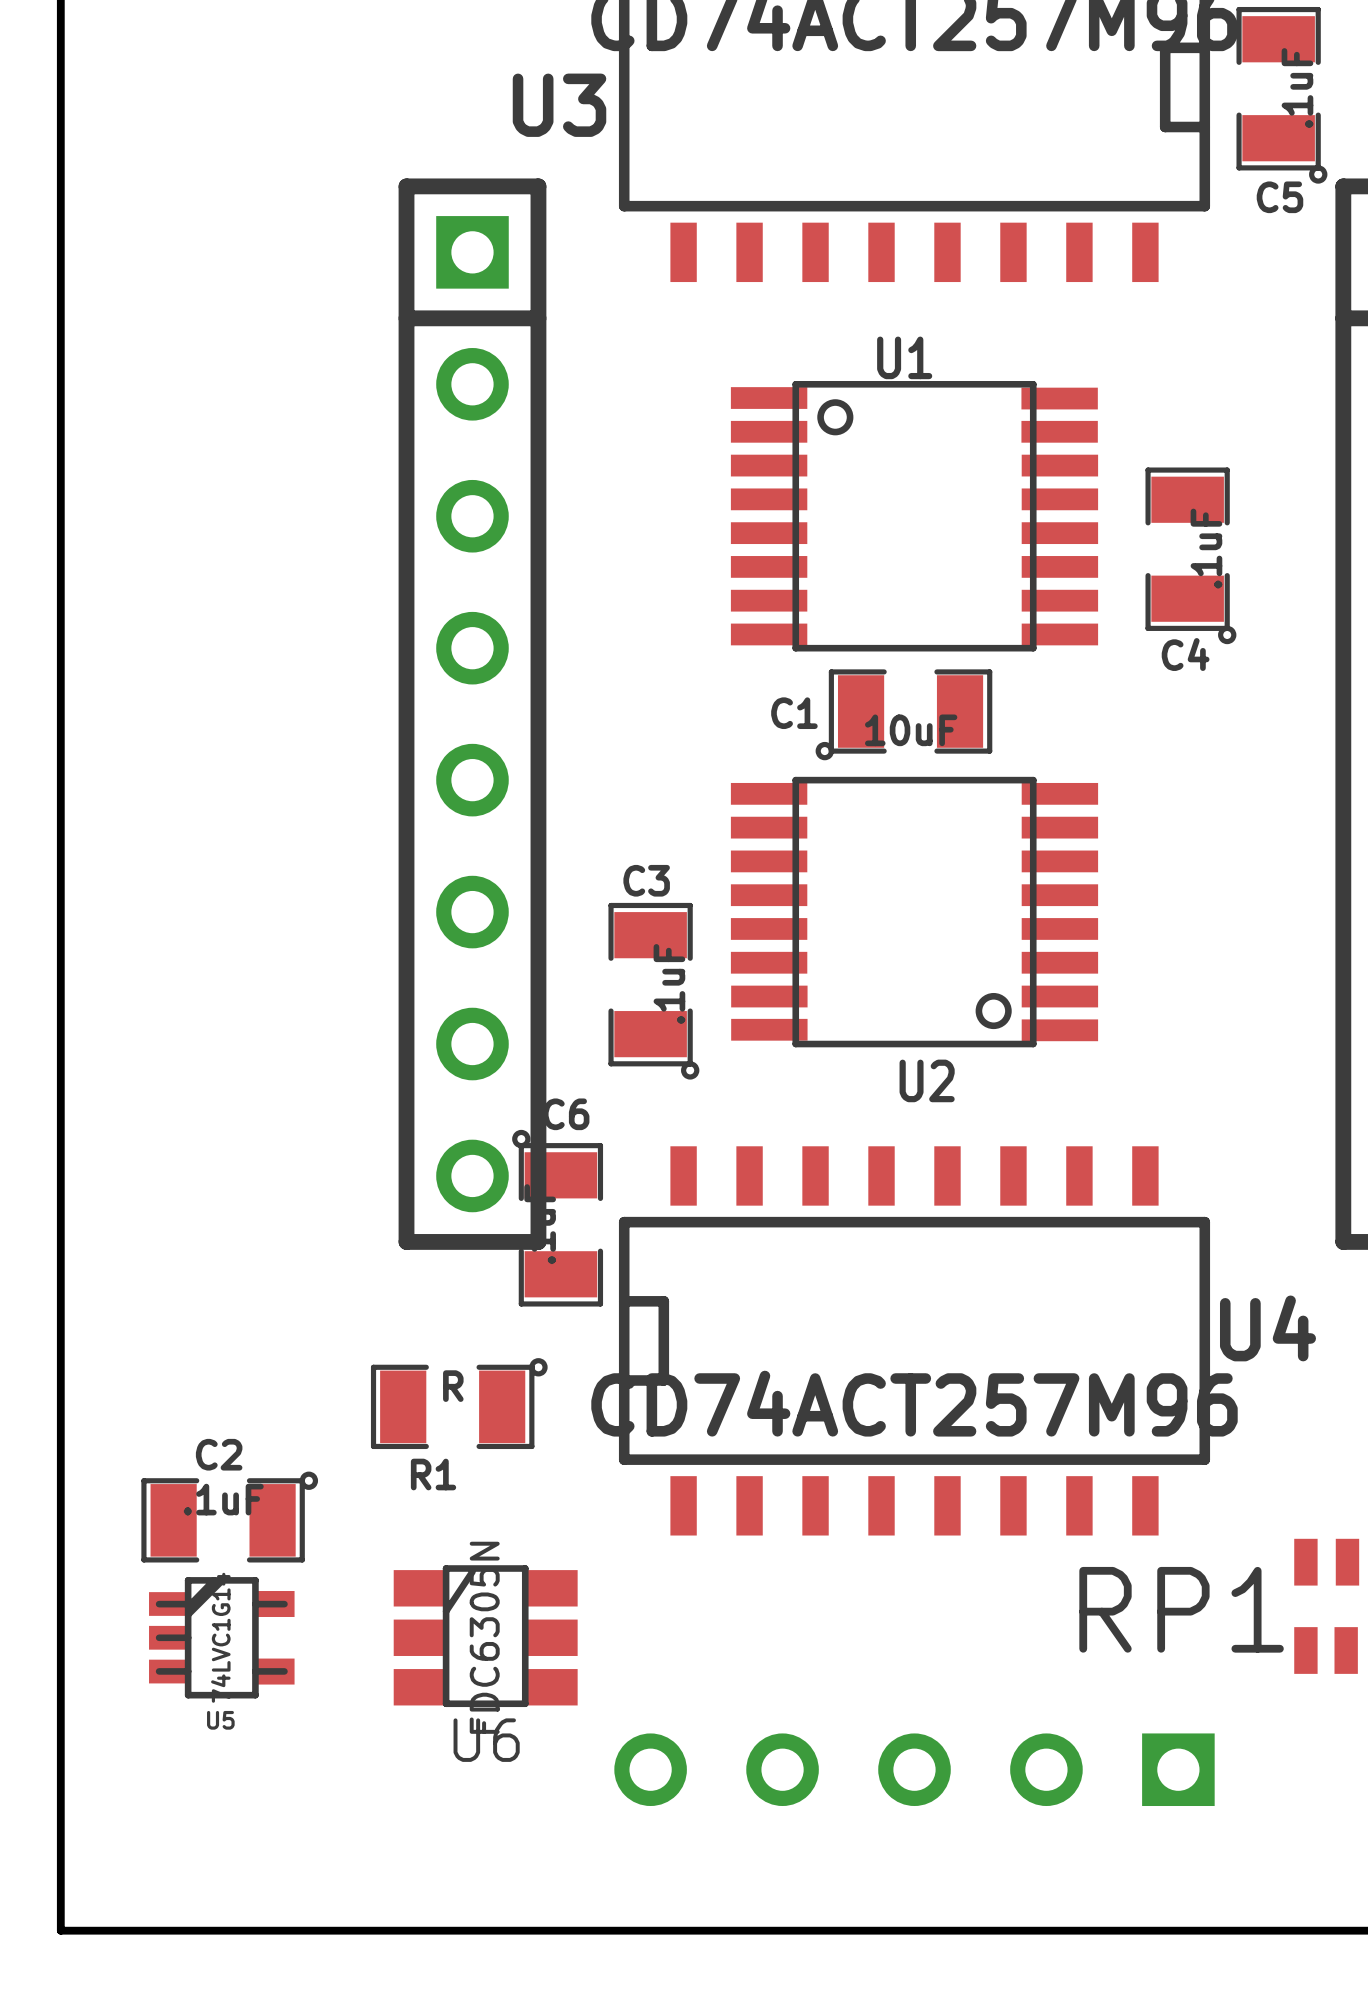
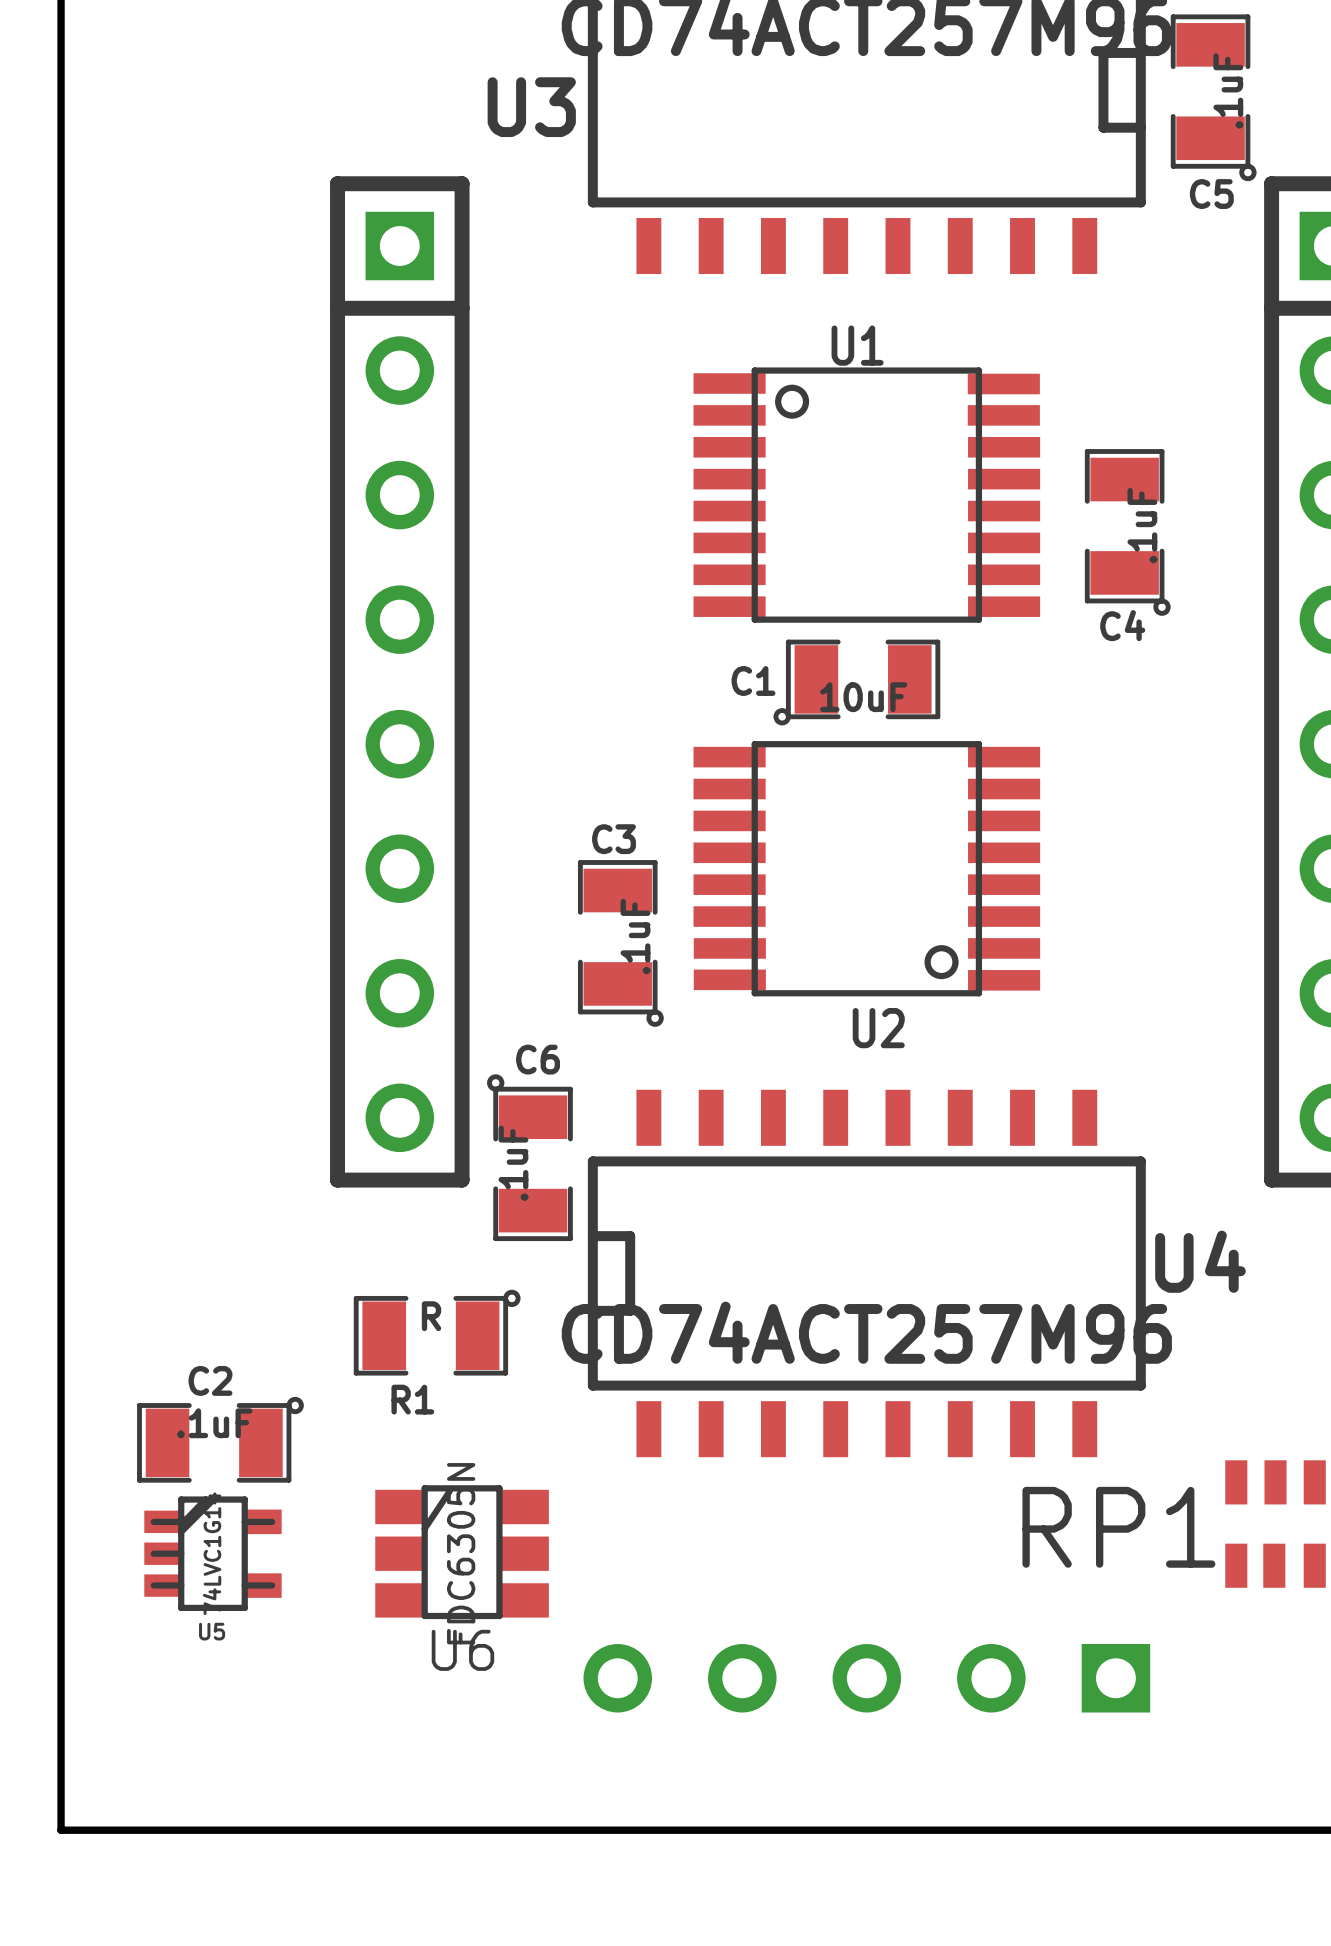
part position: (472, 714) -> (399, 681)

